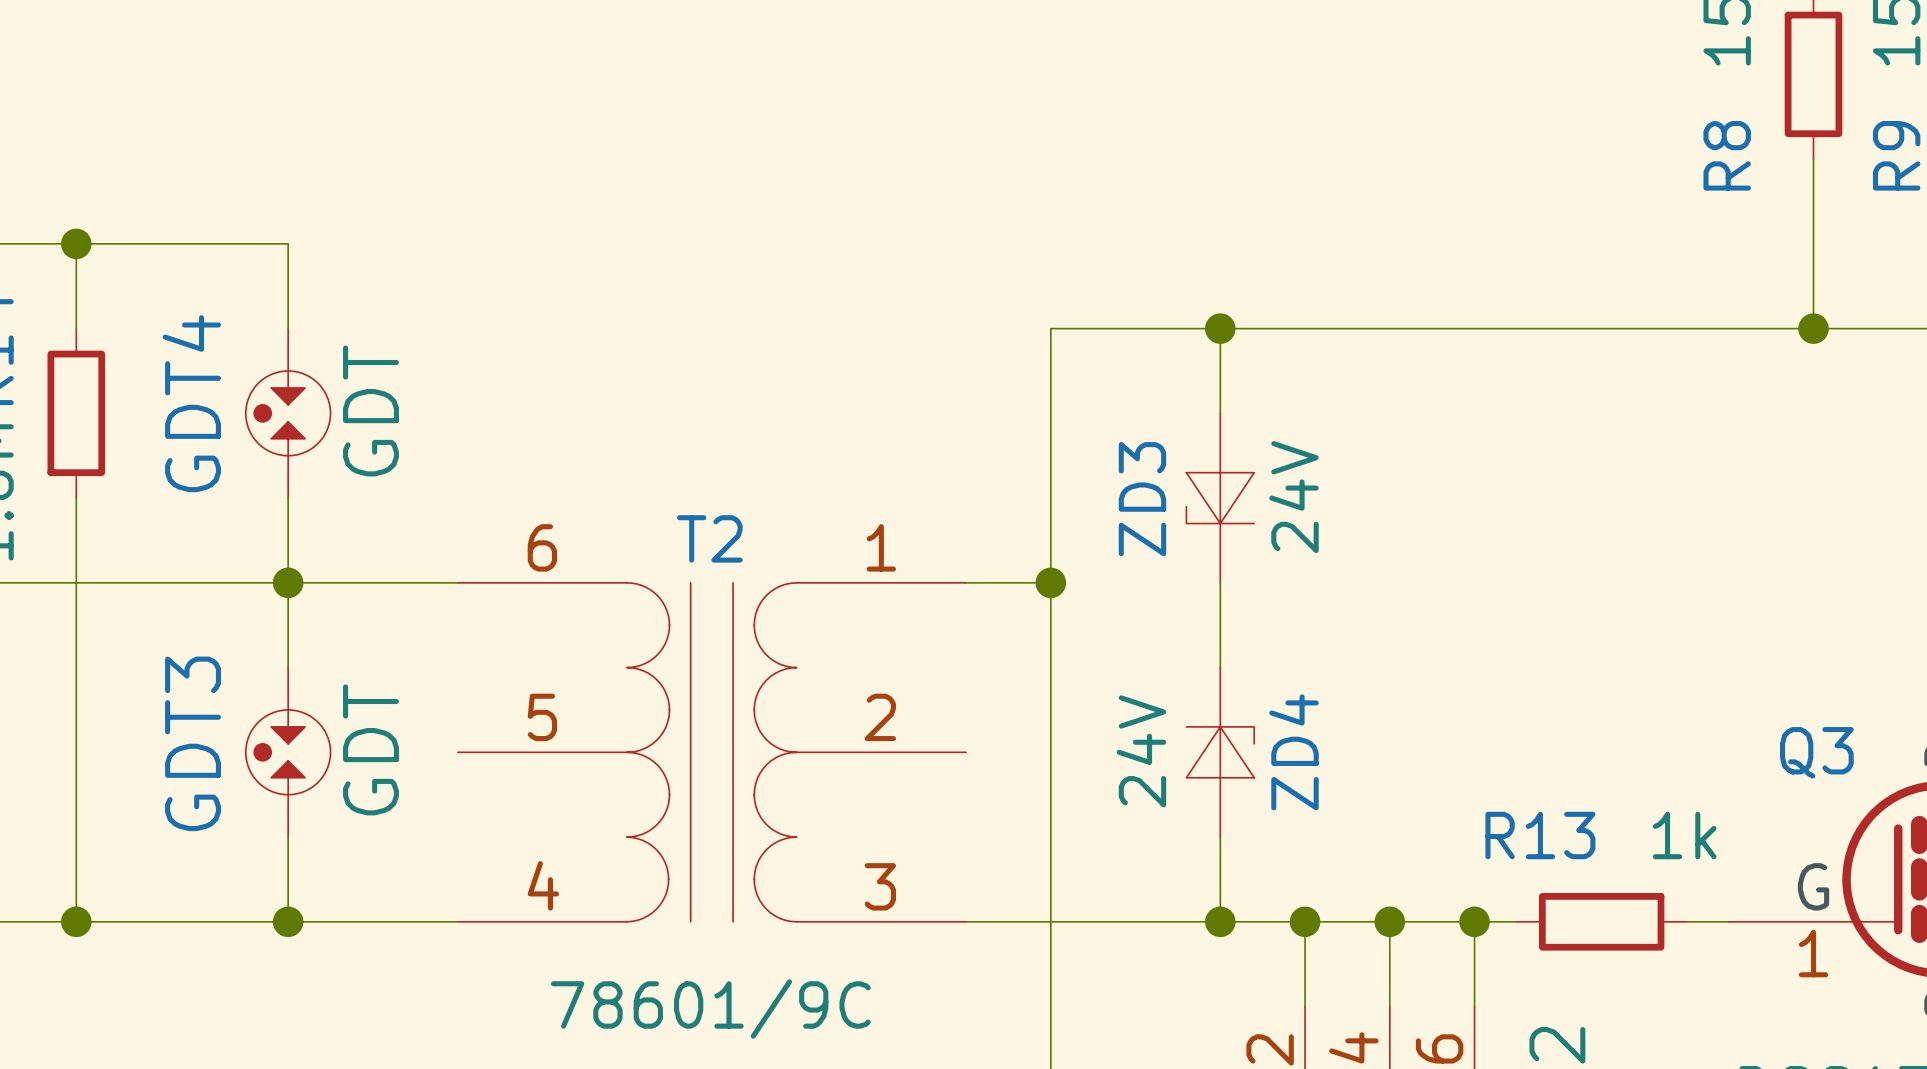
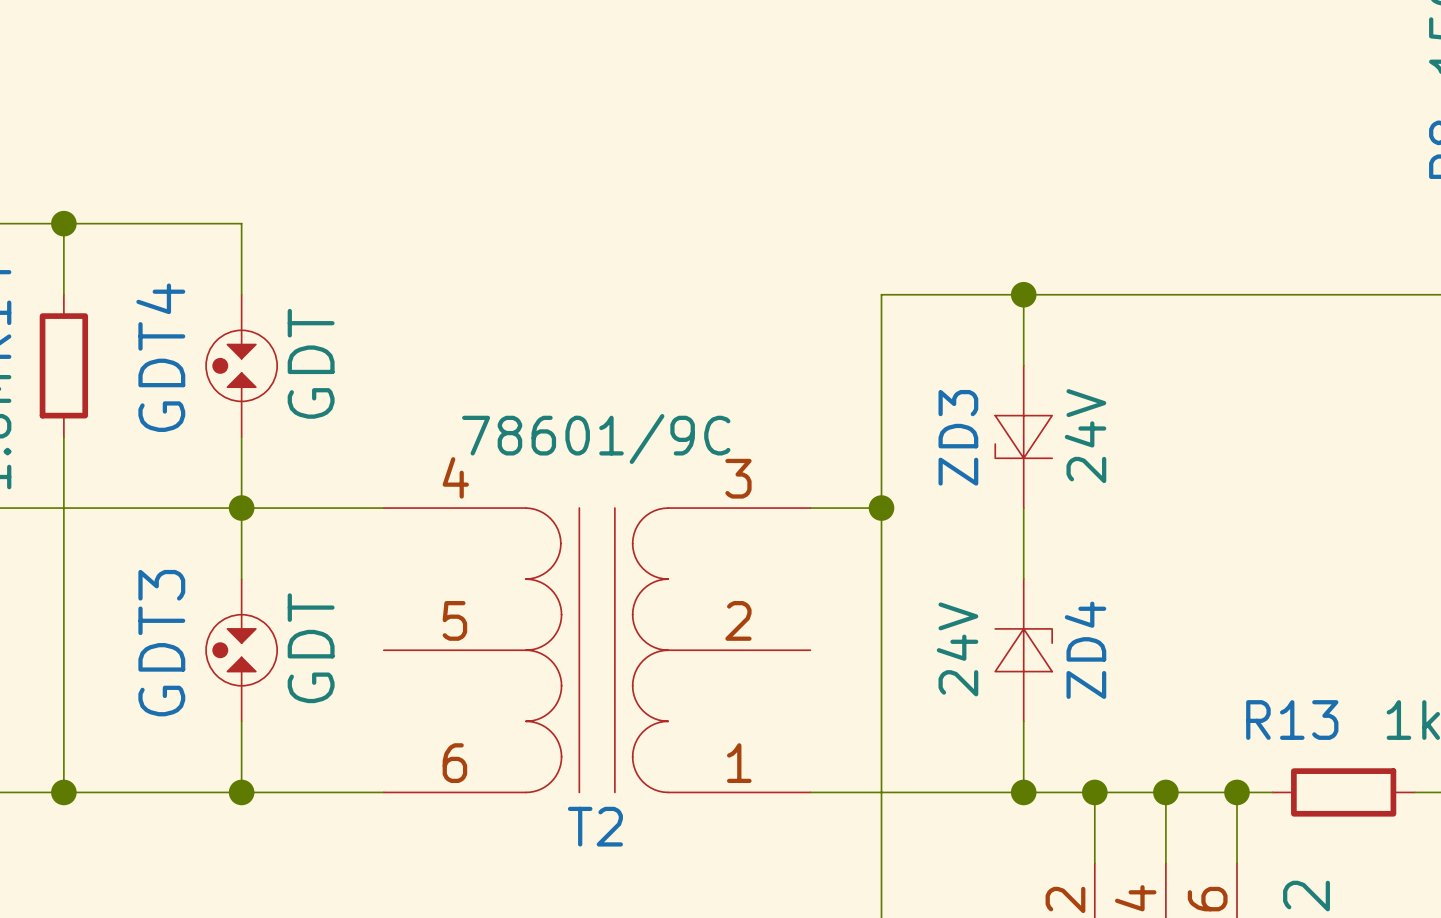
T2 flip: as is (711, 752) -> up-down (597, 650)

